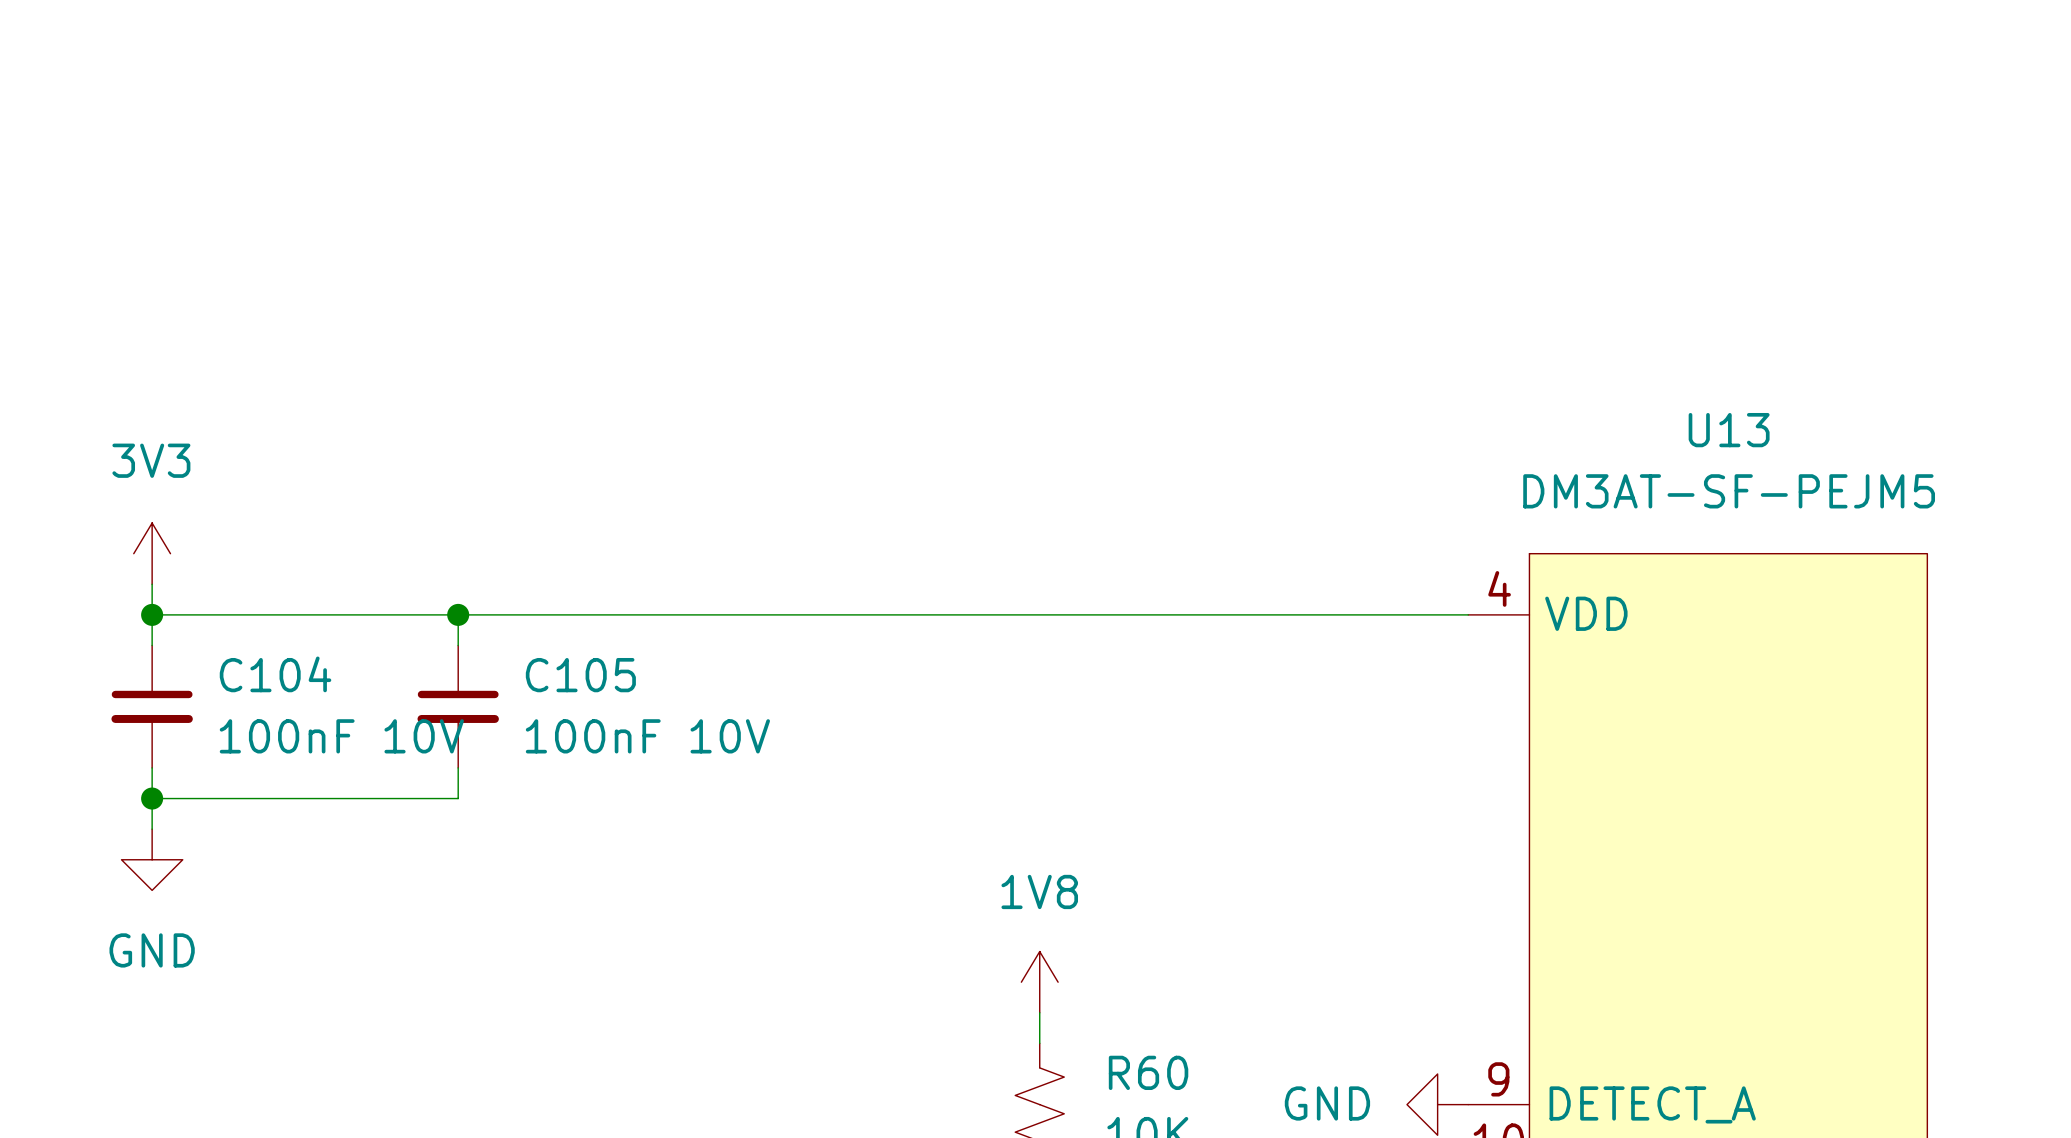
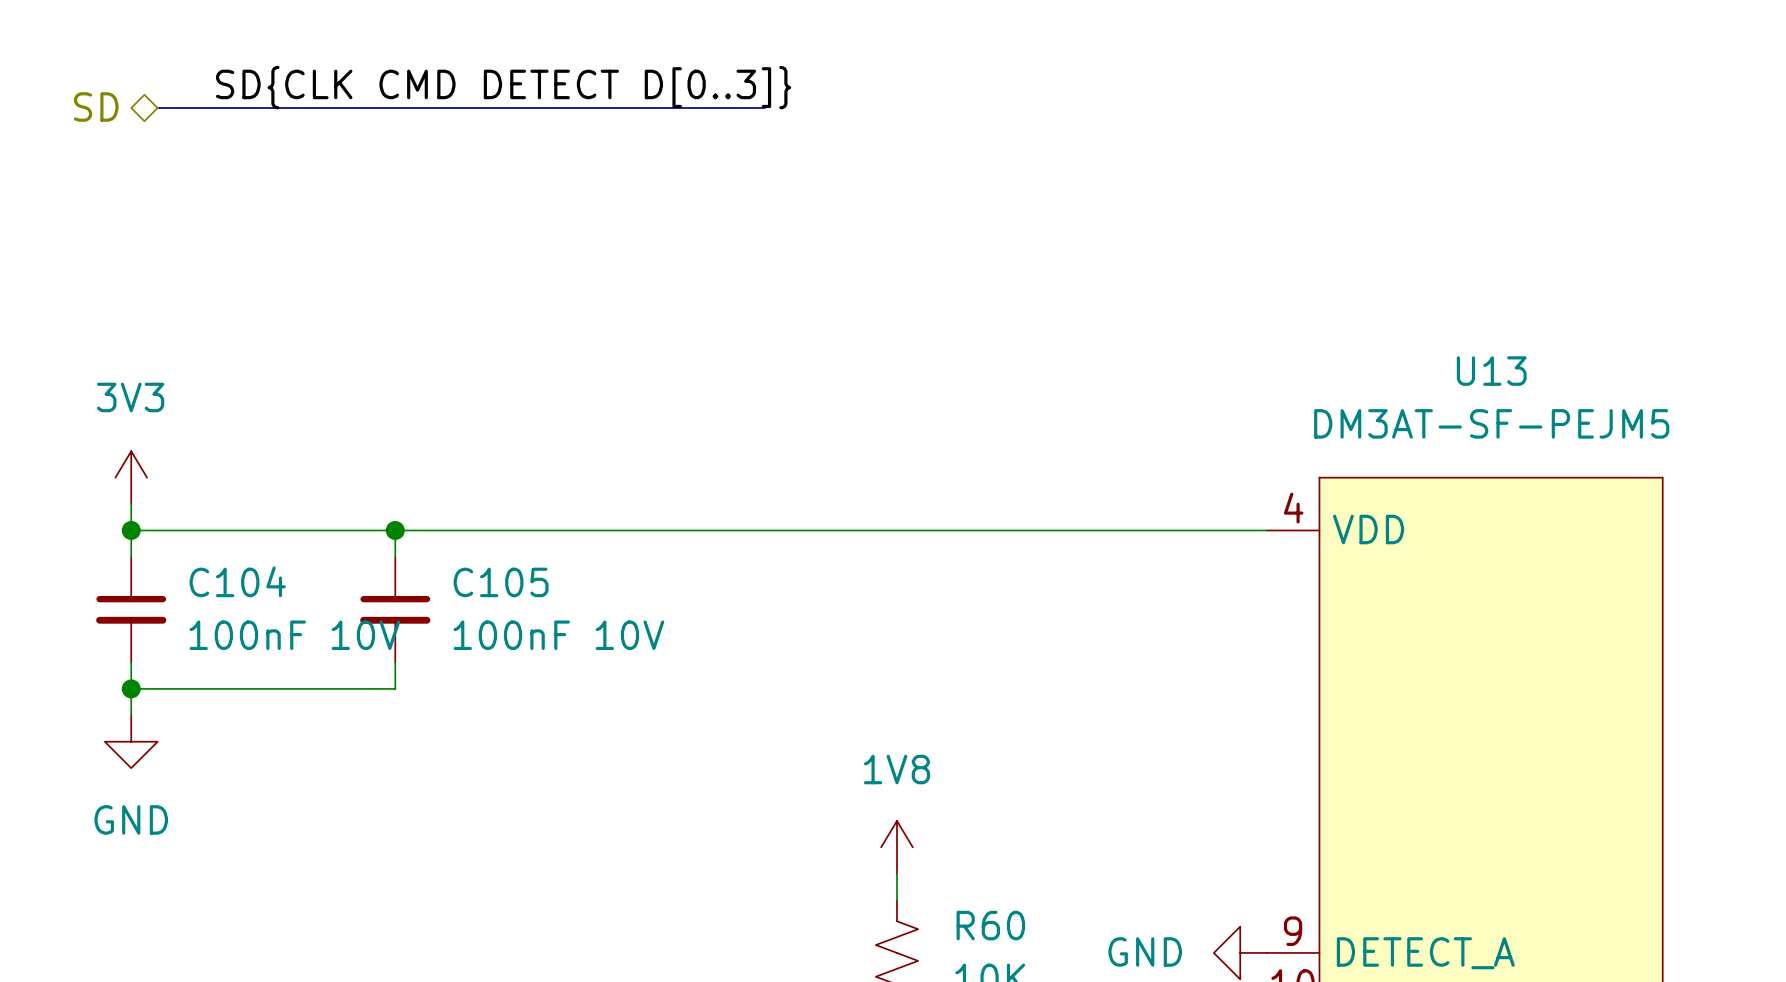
label: none -> SD{CLK CMD DETECT D[0..3]} (503, 87)
hierarchical label: none -> SD (96, 107)
bus: none -> (157, 108) (764, 108)

